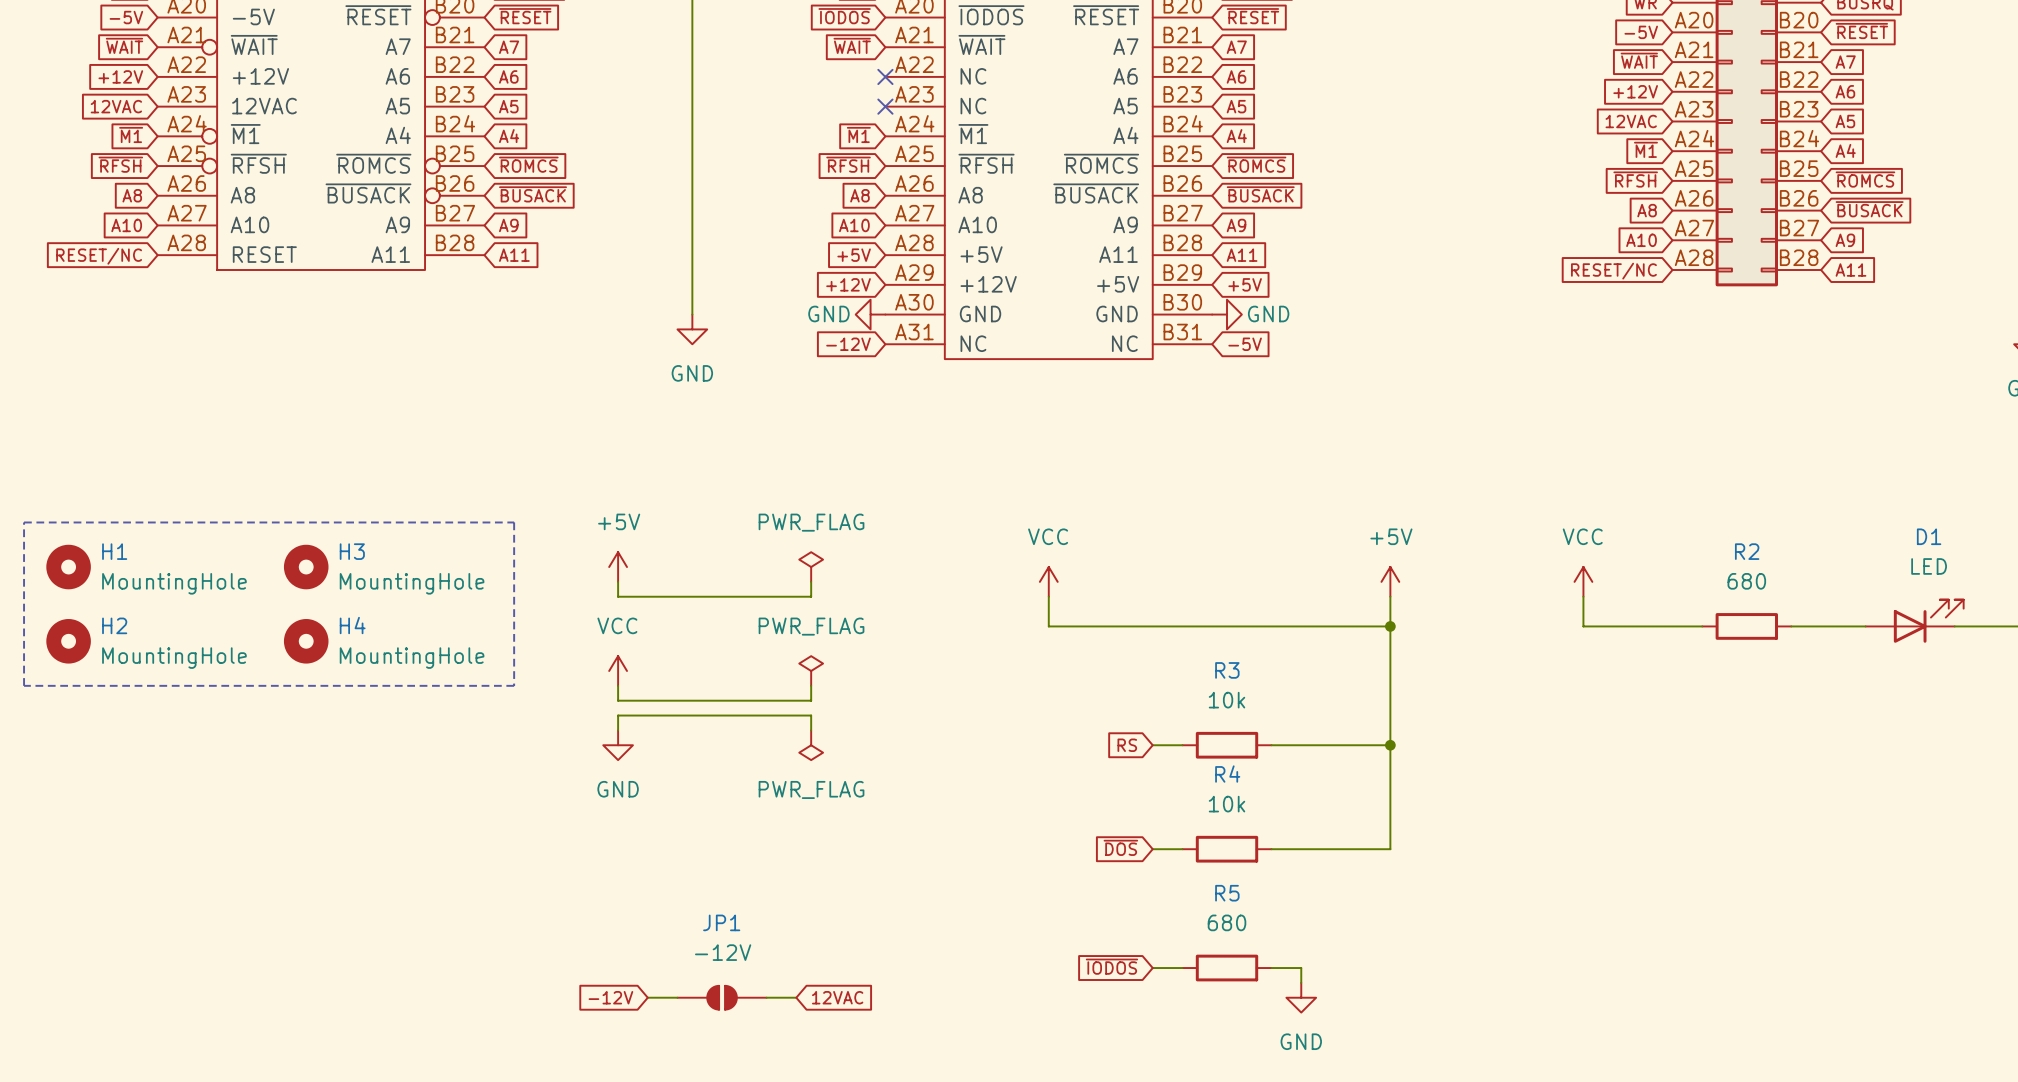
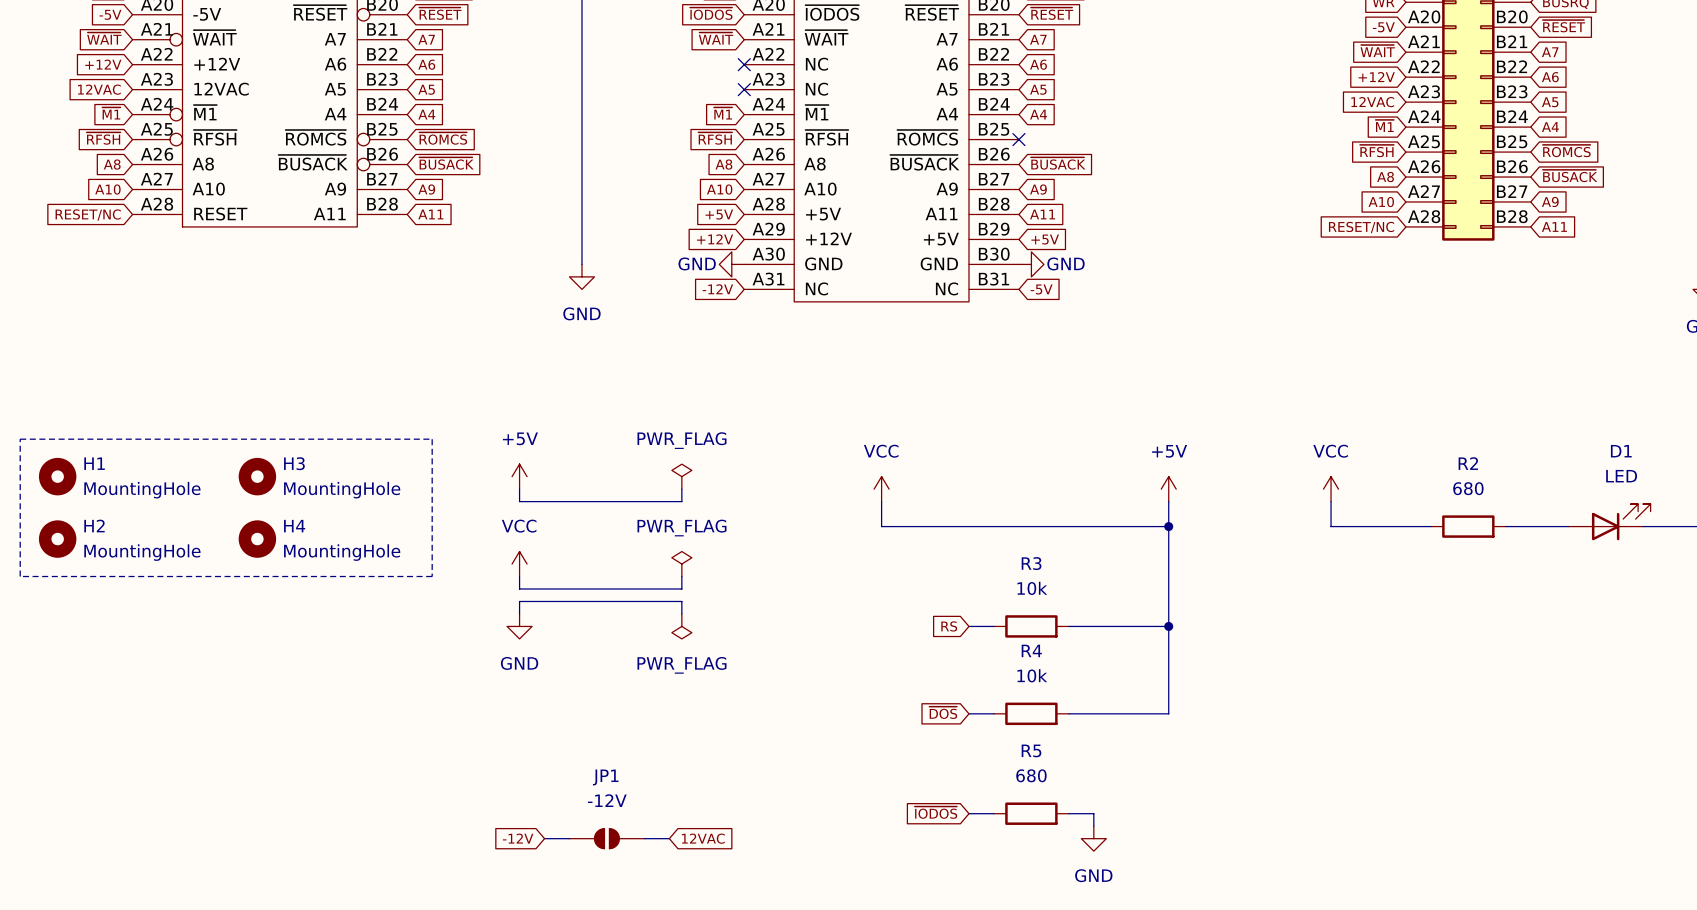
global label: ~{ROMCS} (1256, 164) -> none
no-connect mark: none -> (1018, 139)

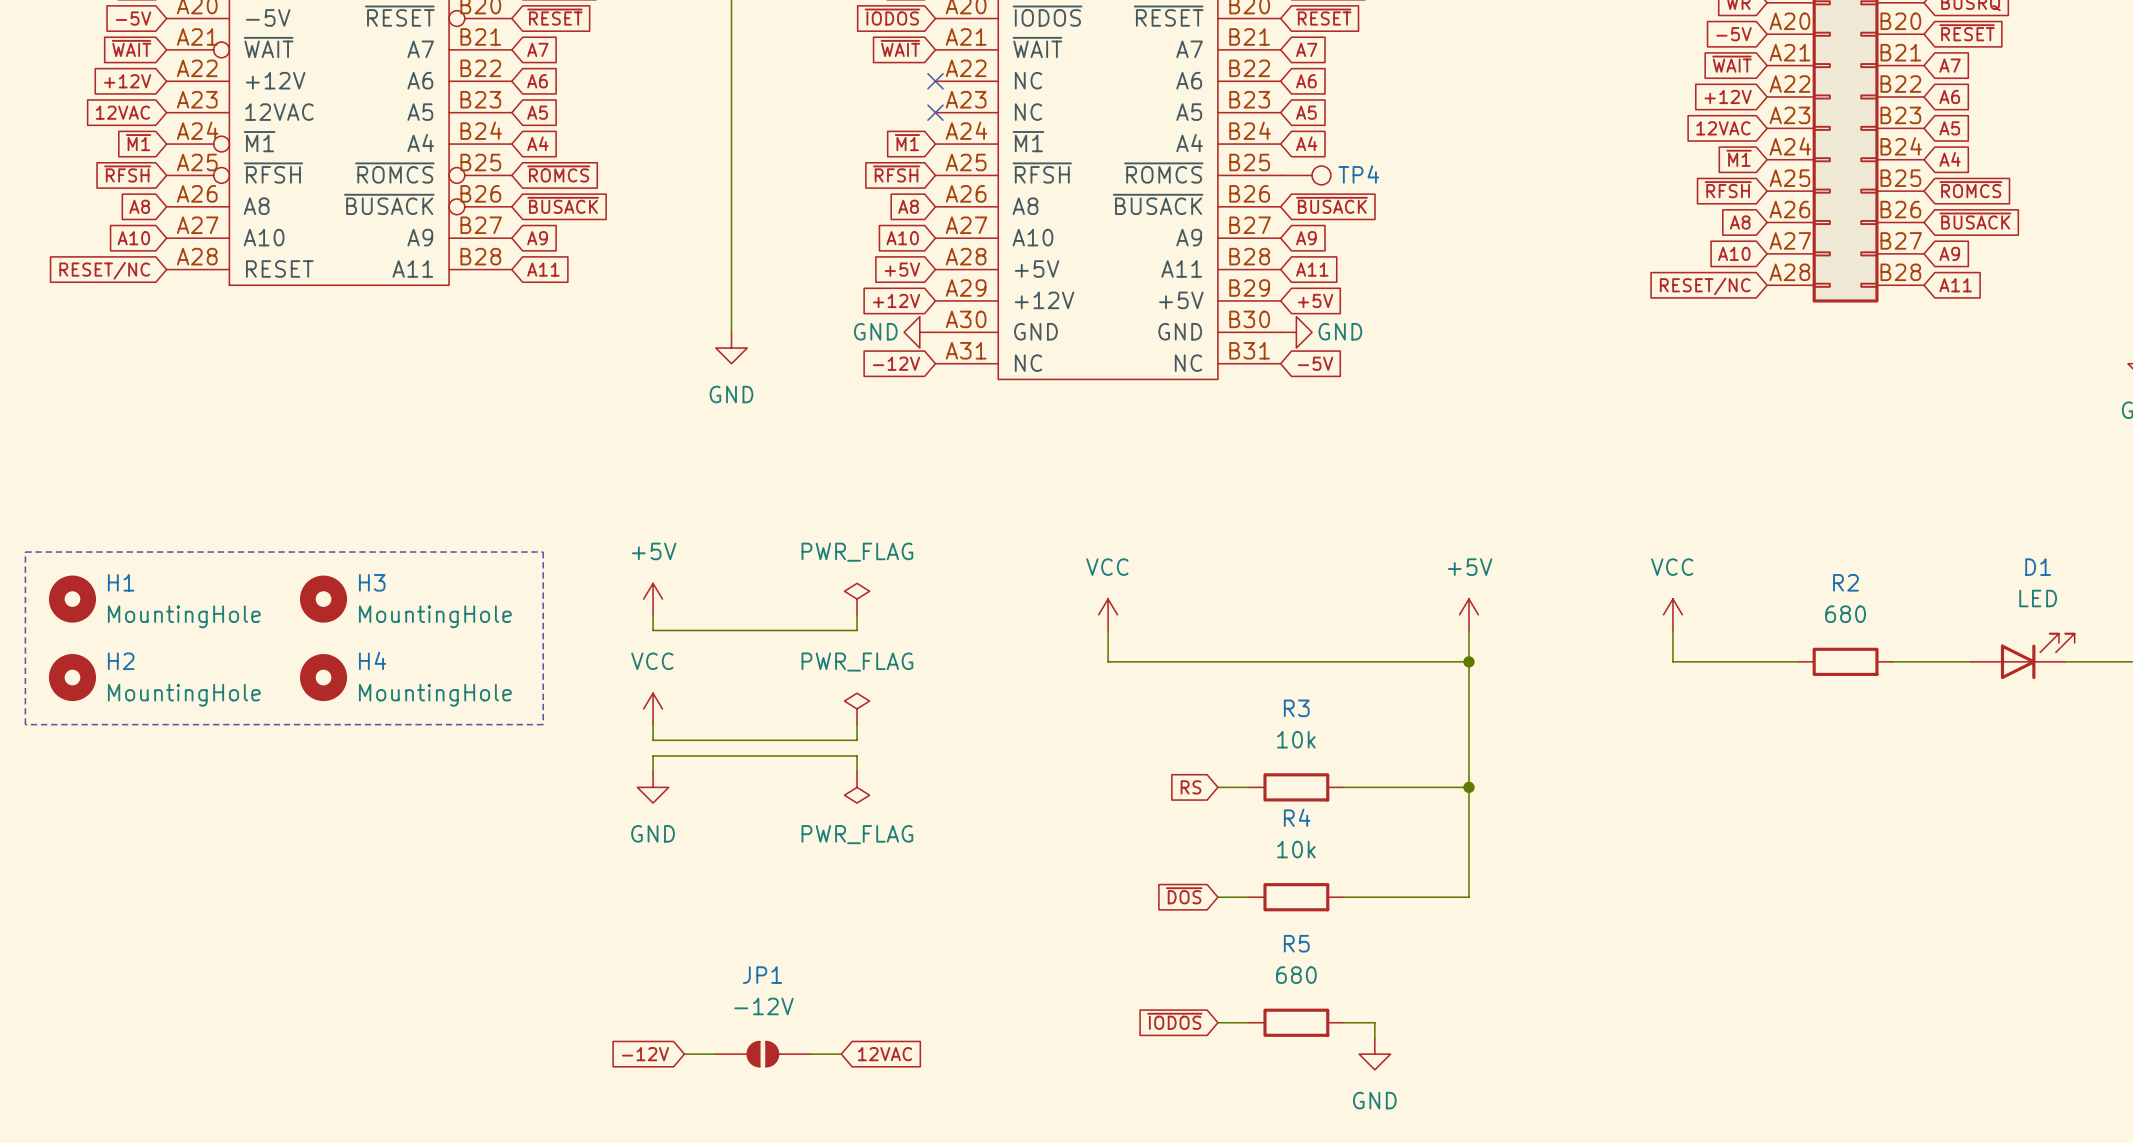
no-connect mark: (1018, 139) -> none
TP4: none -> (1305, 175)

